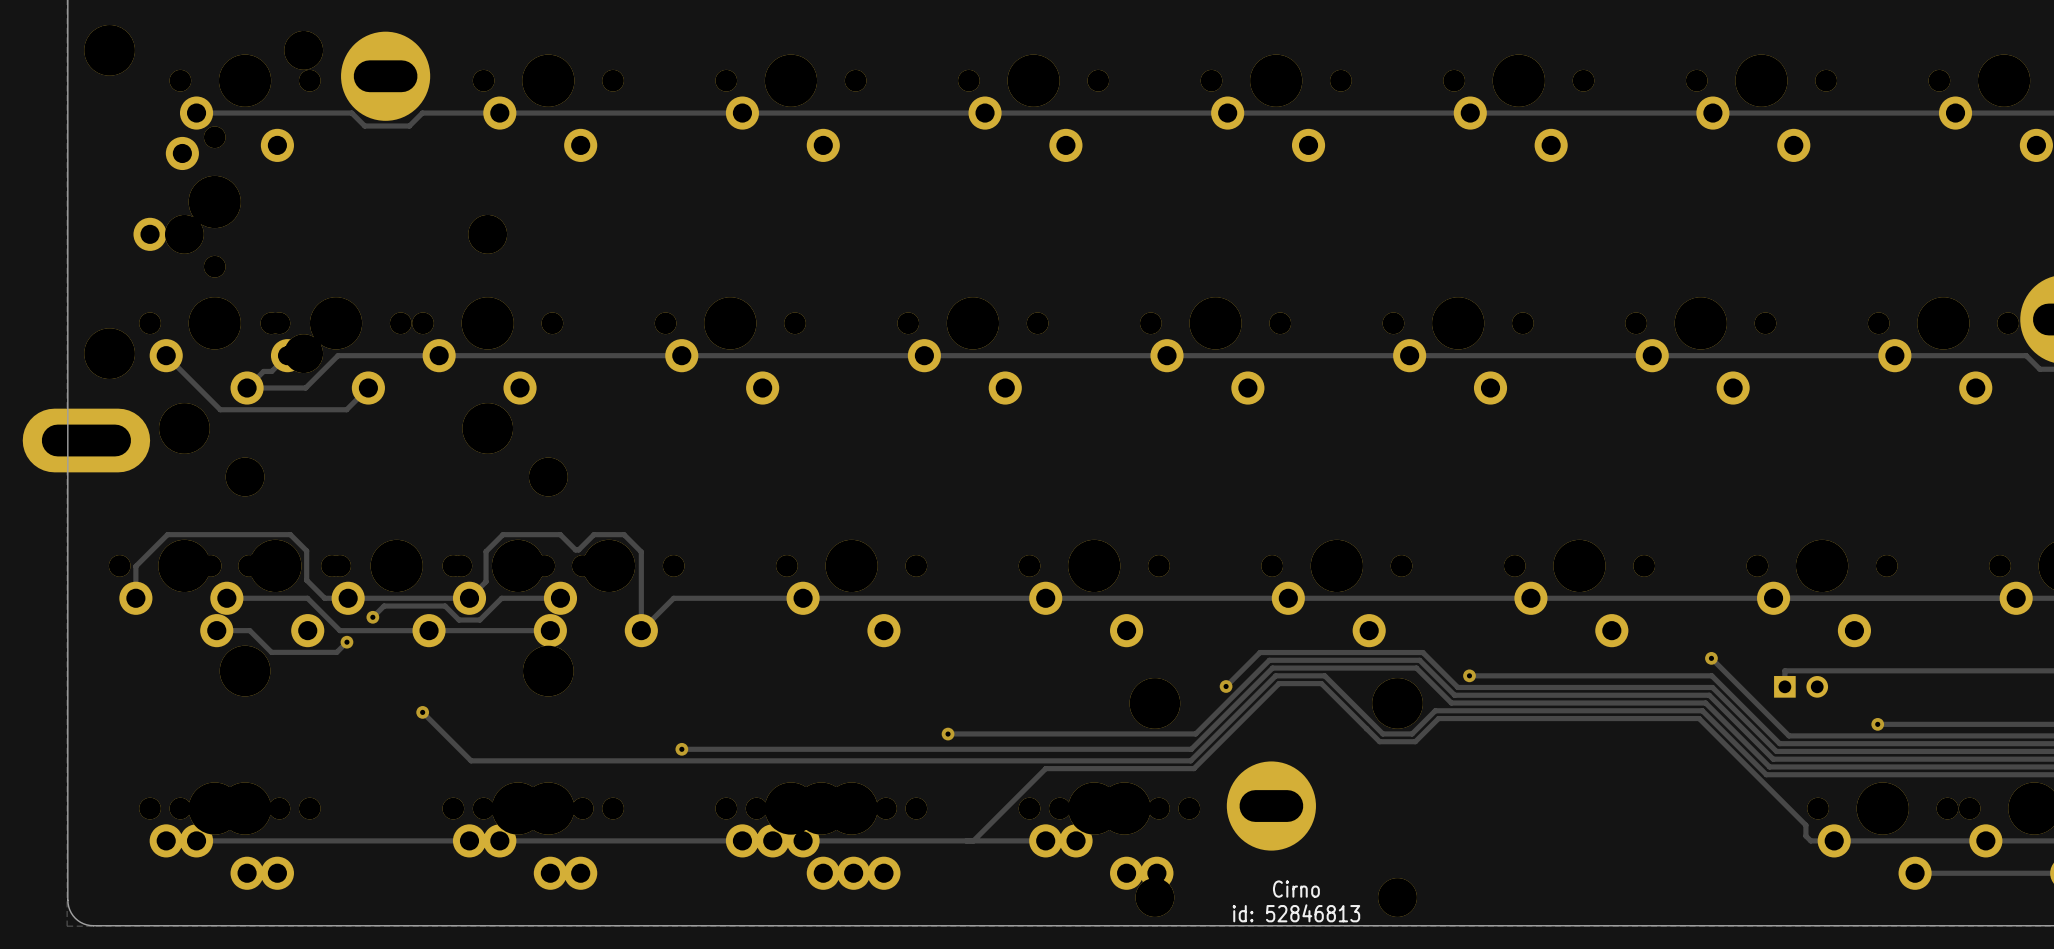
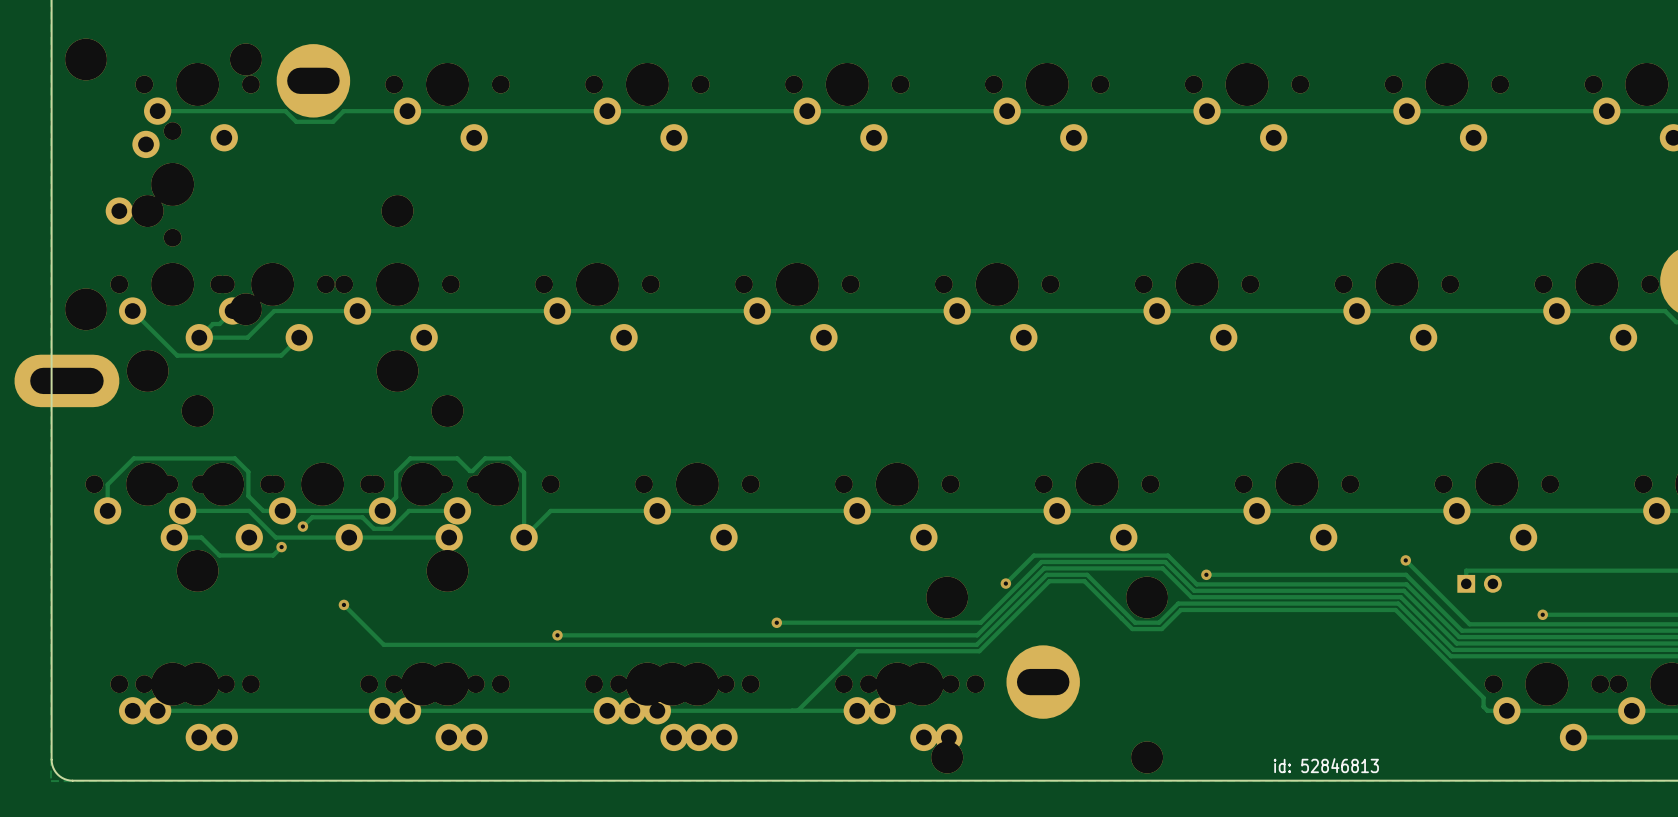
text: Cirno (1296, 889) -> none
text: none -> id: 52846813 (1326, 765)
text: id: 52846813 (1296, 913) -> none

